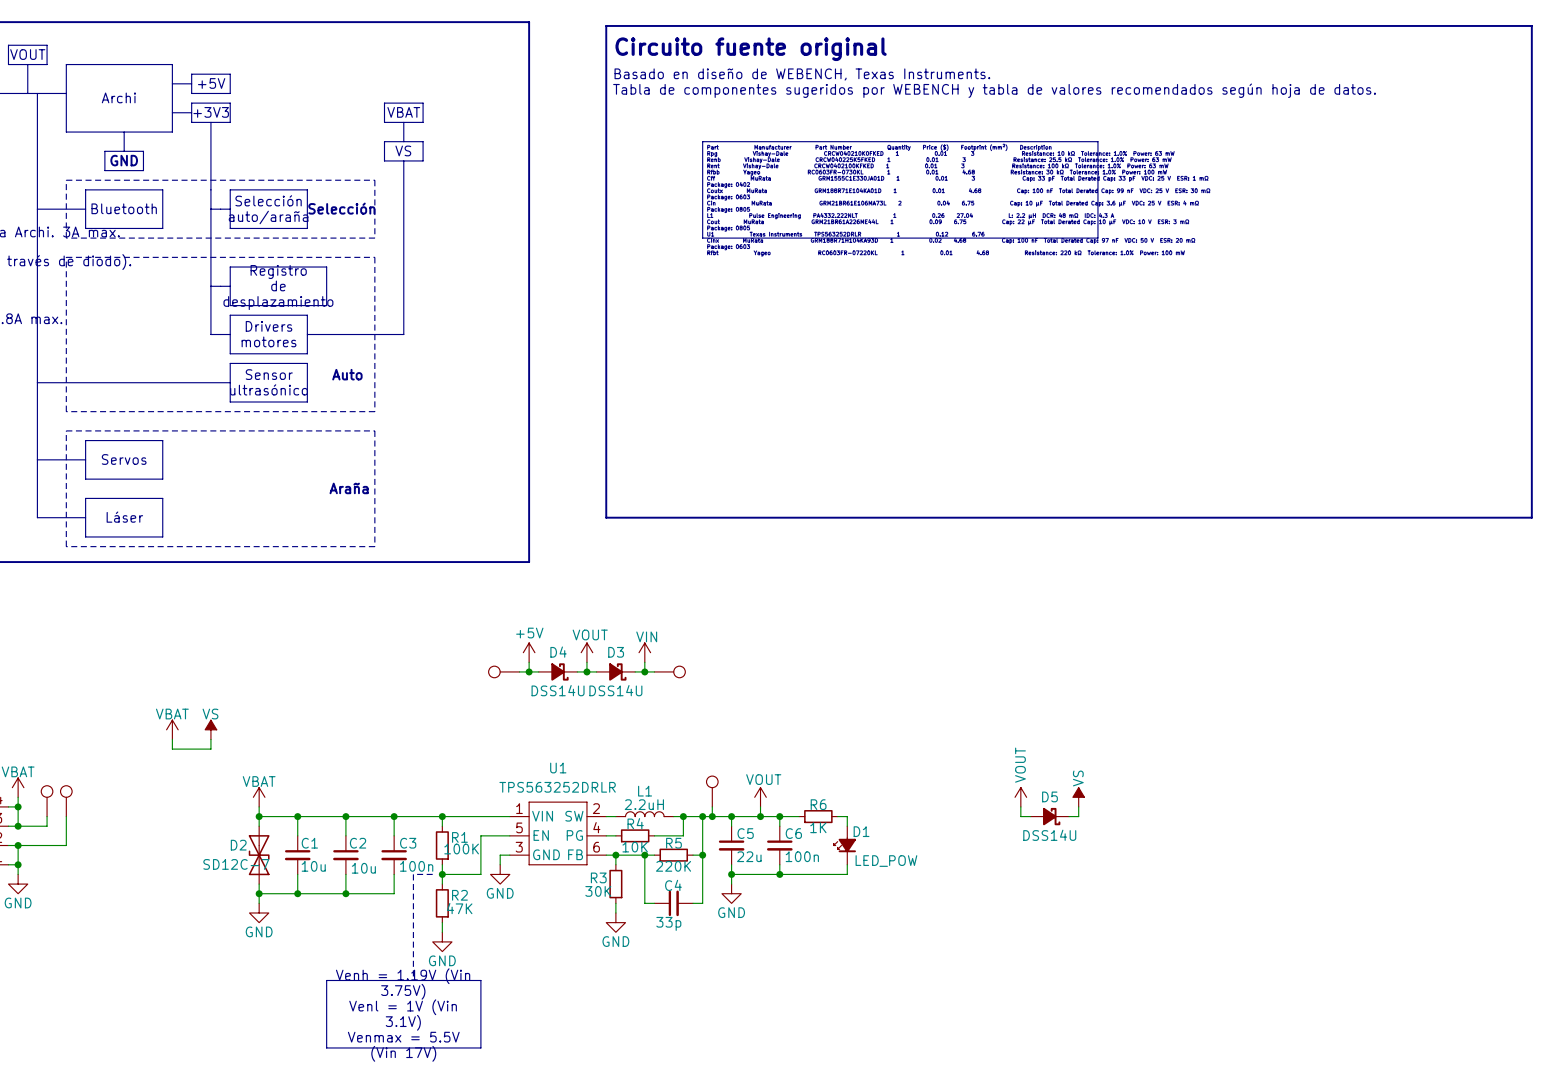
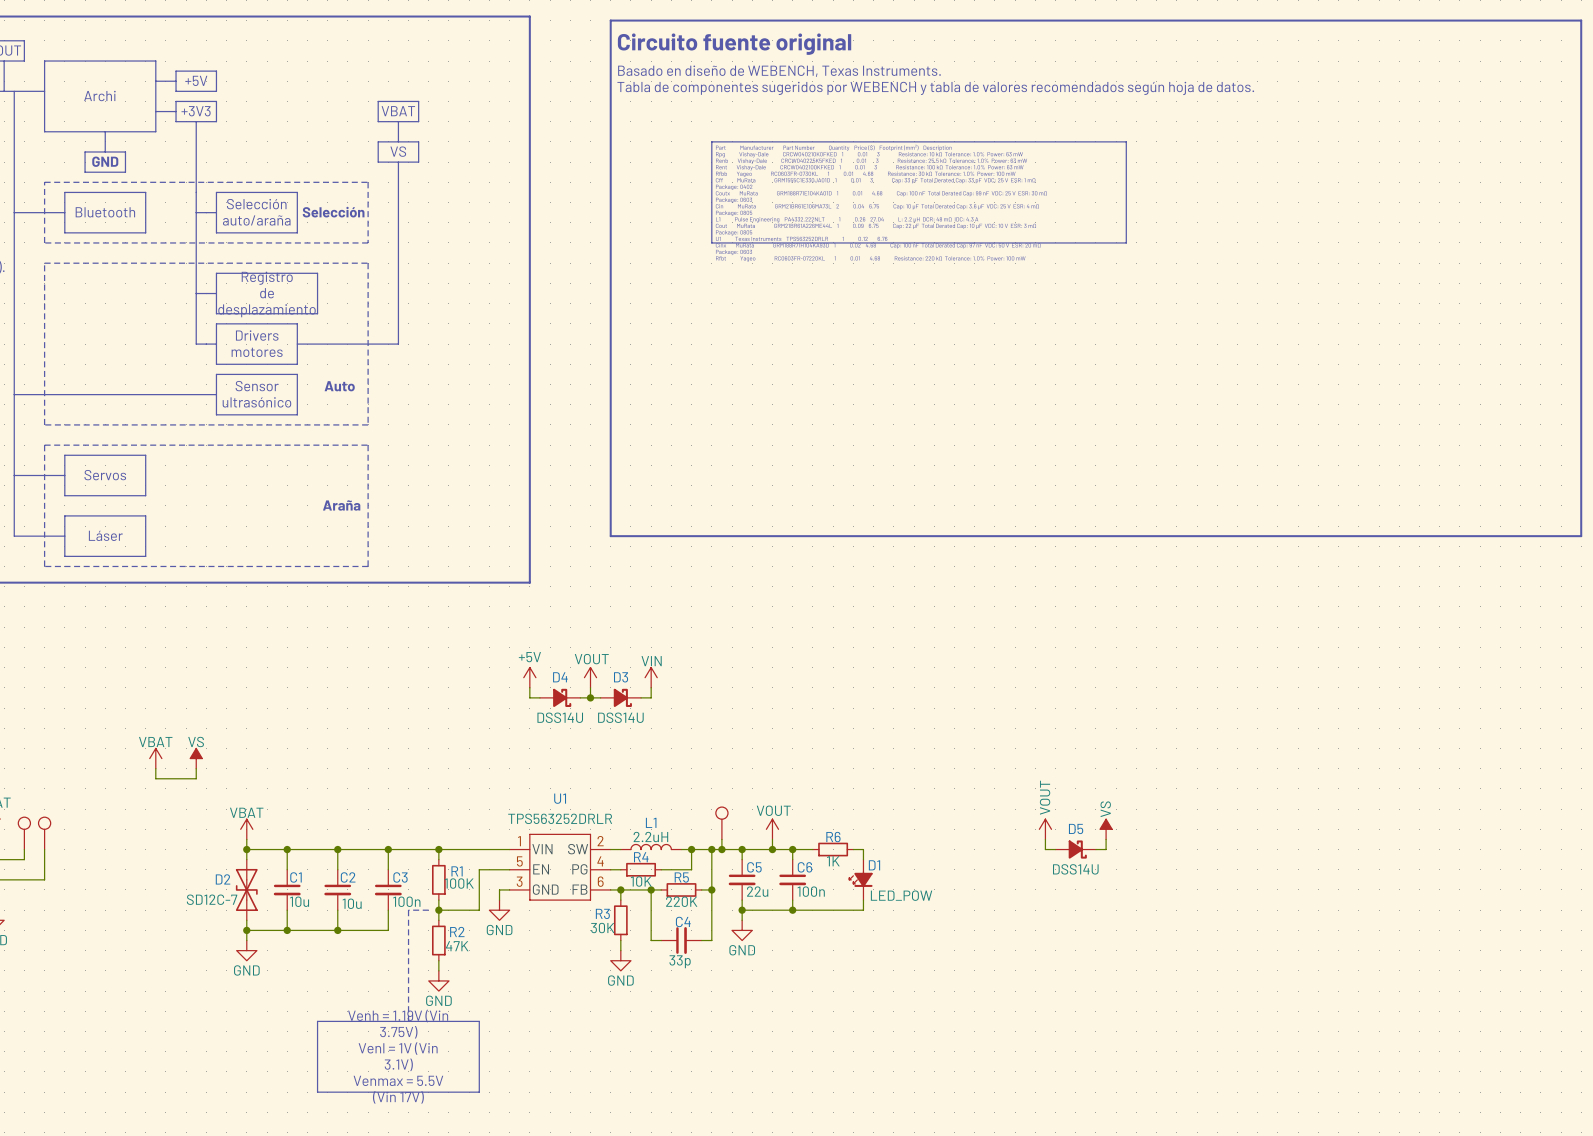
part: (504, 671) -> none
wire: (519, 671) (529, 671) -> none
junction: (529, 671) -> none
wire: (644, 671) (654, 671) -> none
junction: (644, 671) -> none
part: (669, 671) -> none

